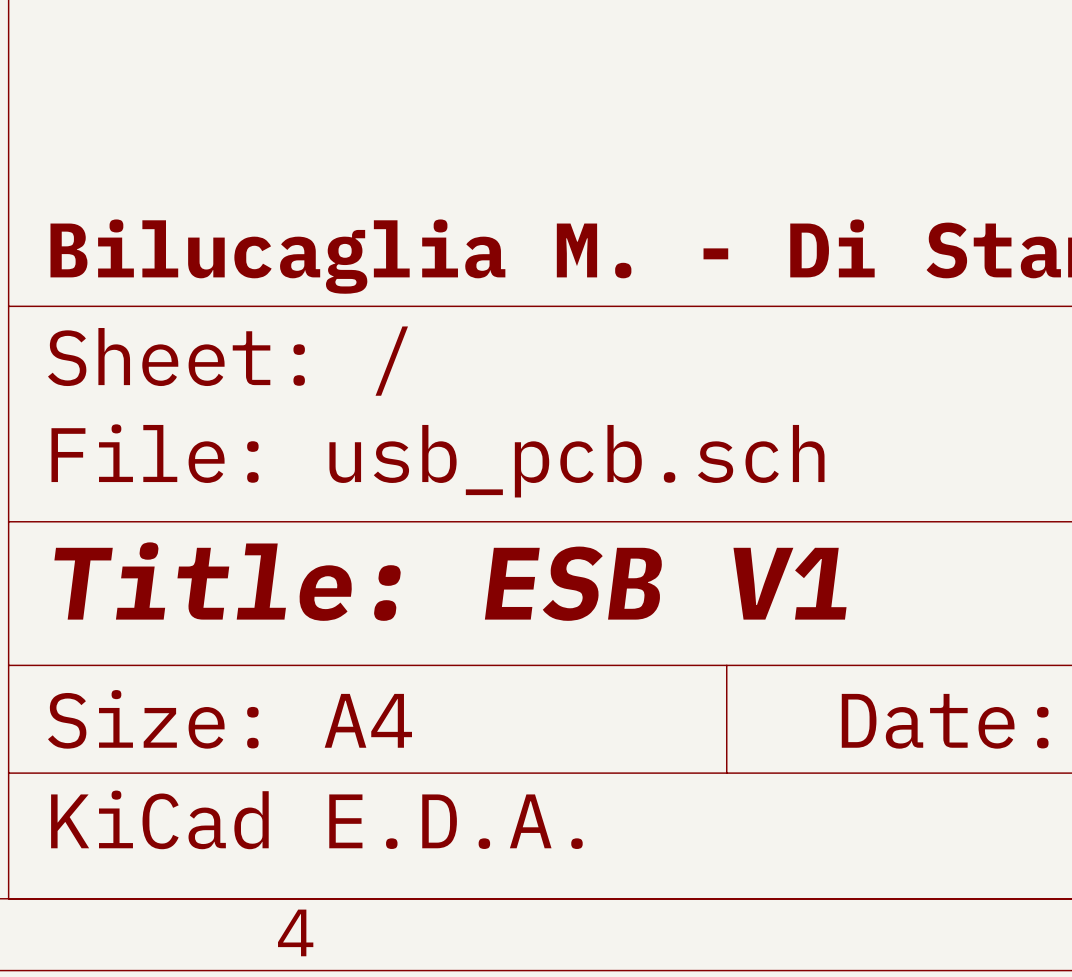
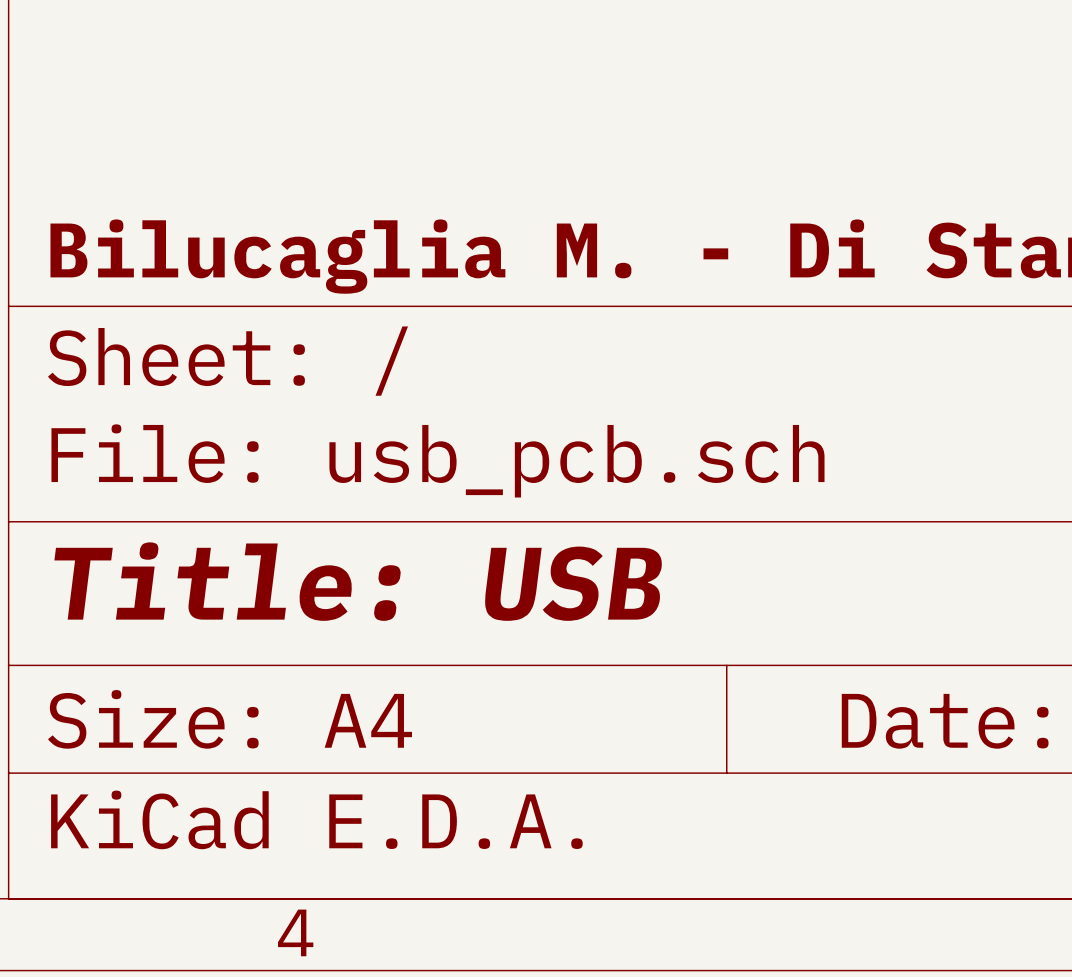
title block: Title: ESB V1 (450, 581) -> Title: USB (358, 581)

